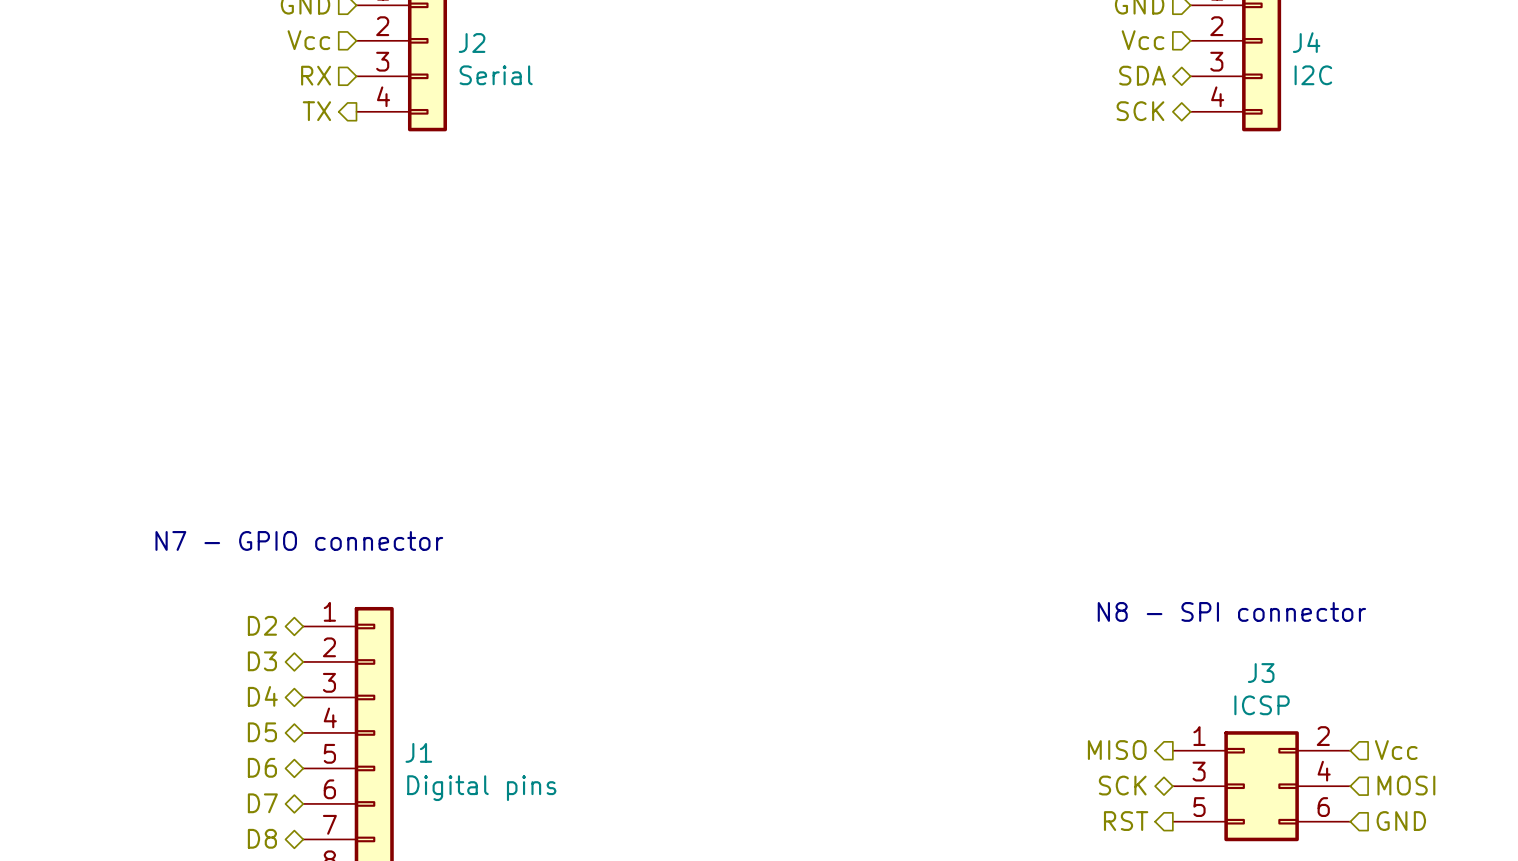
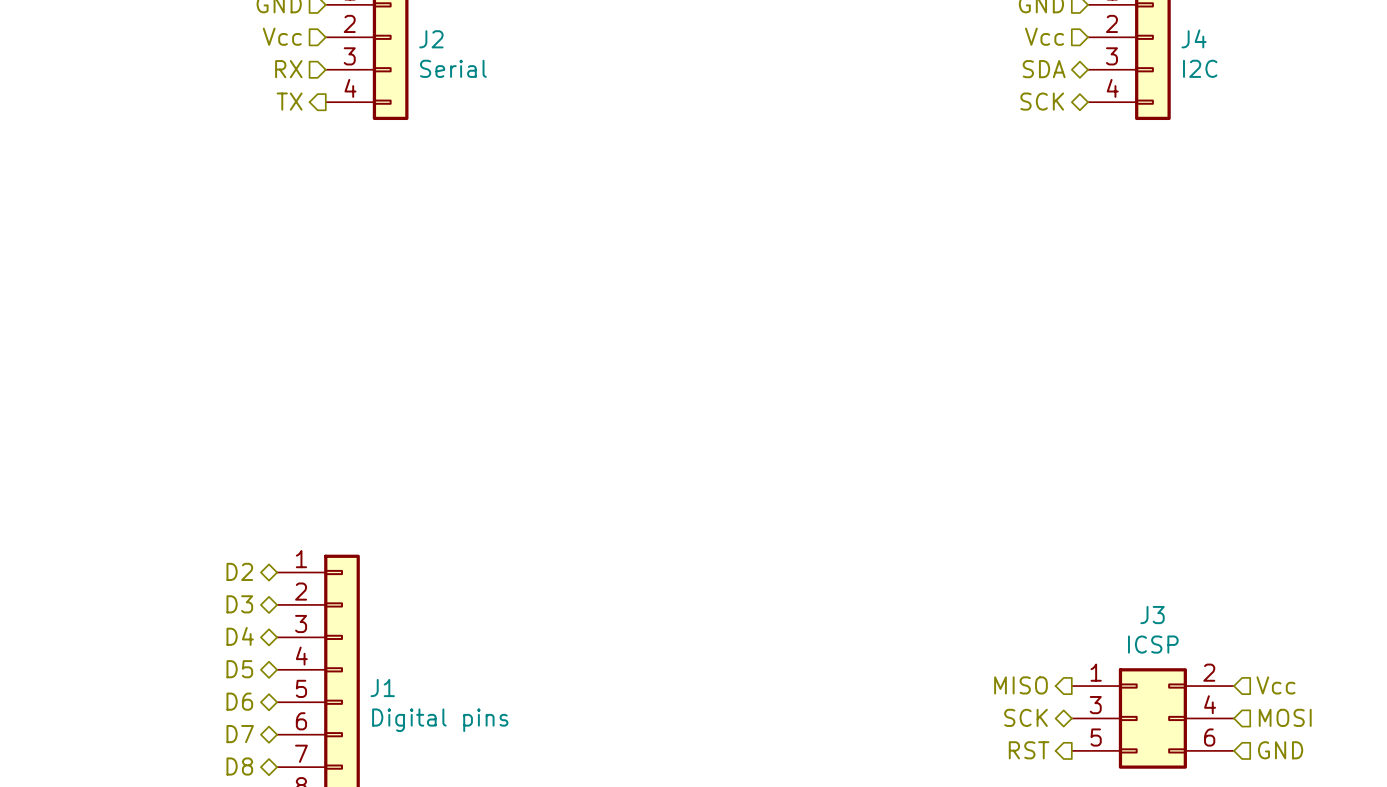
text: N7 - GPIO connector (299, 540) -> none
text: N8 - SPI connector (1231, 611) -> none

